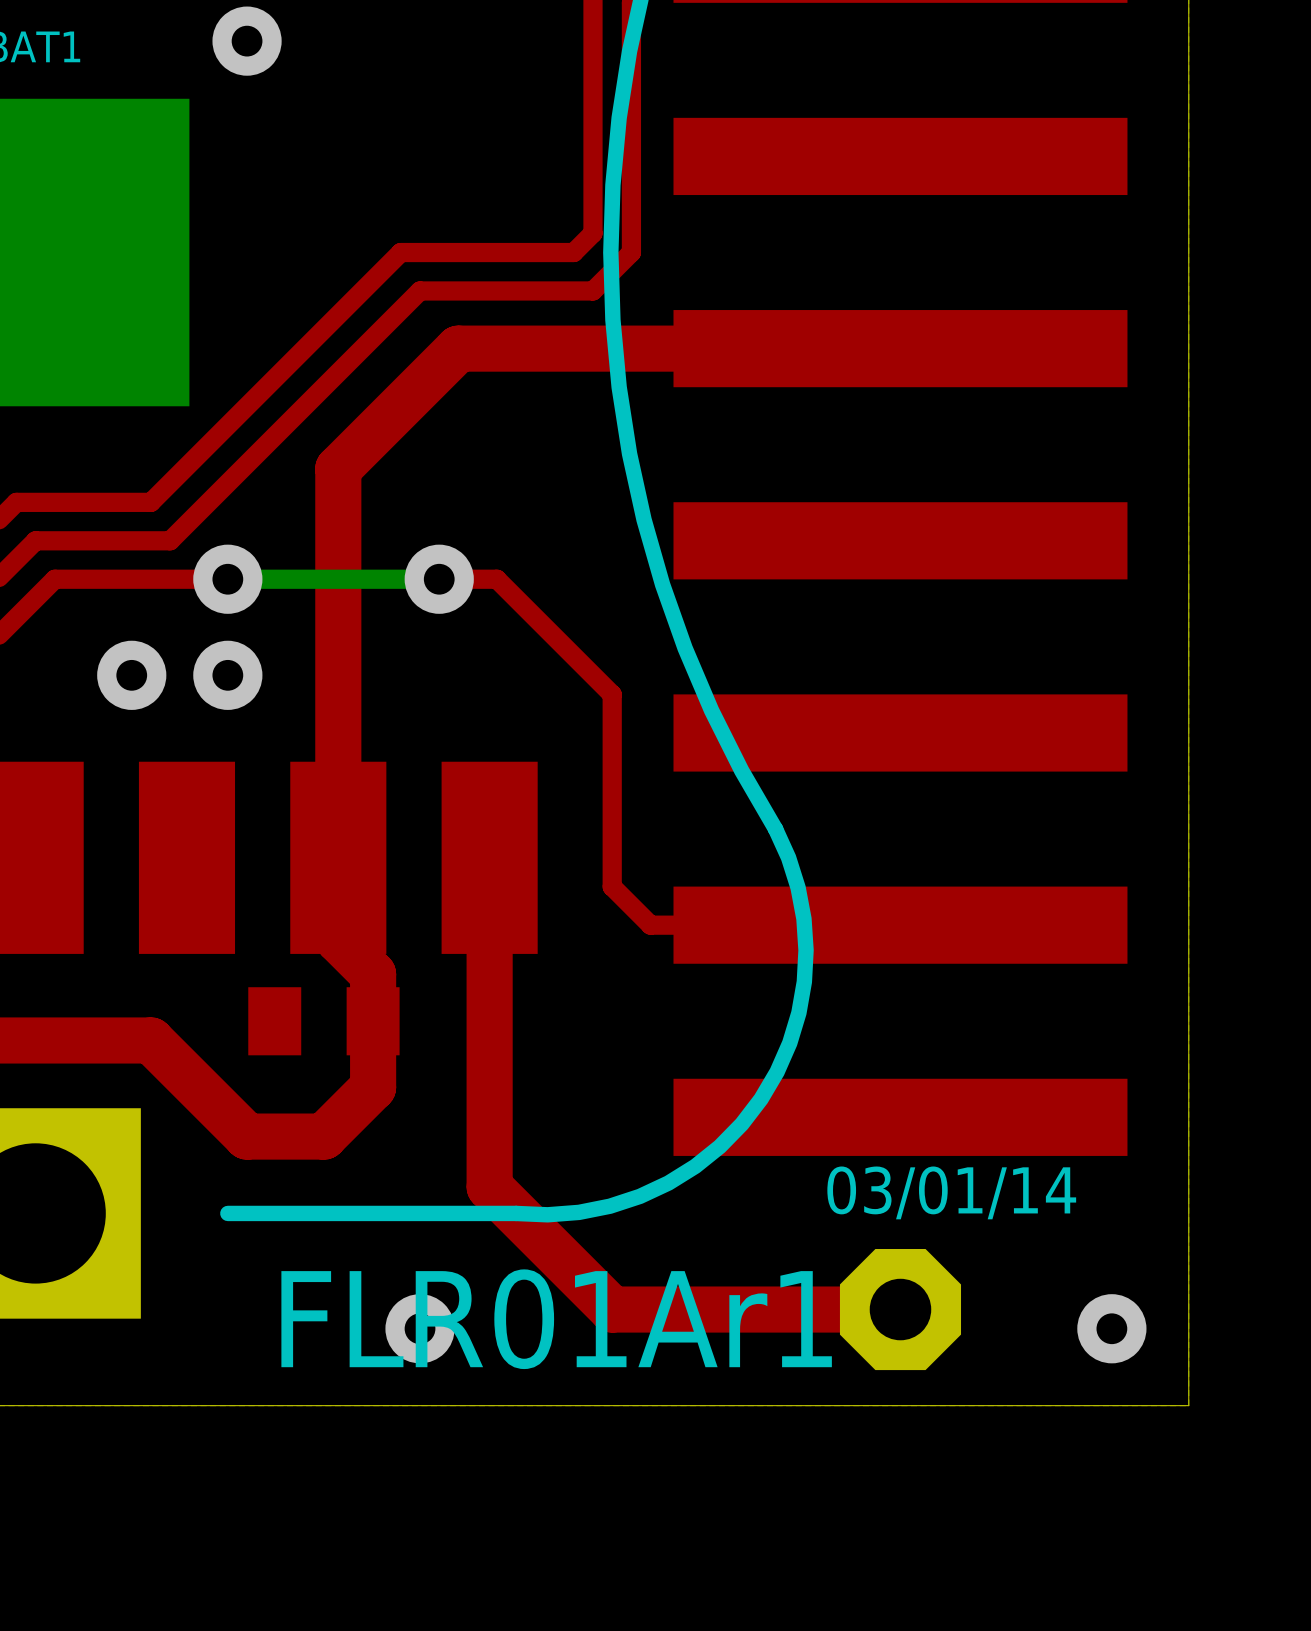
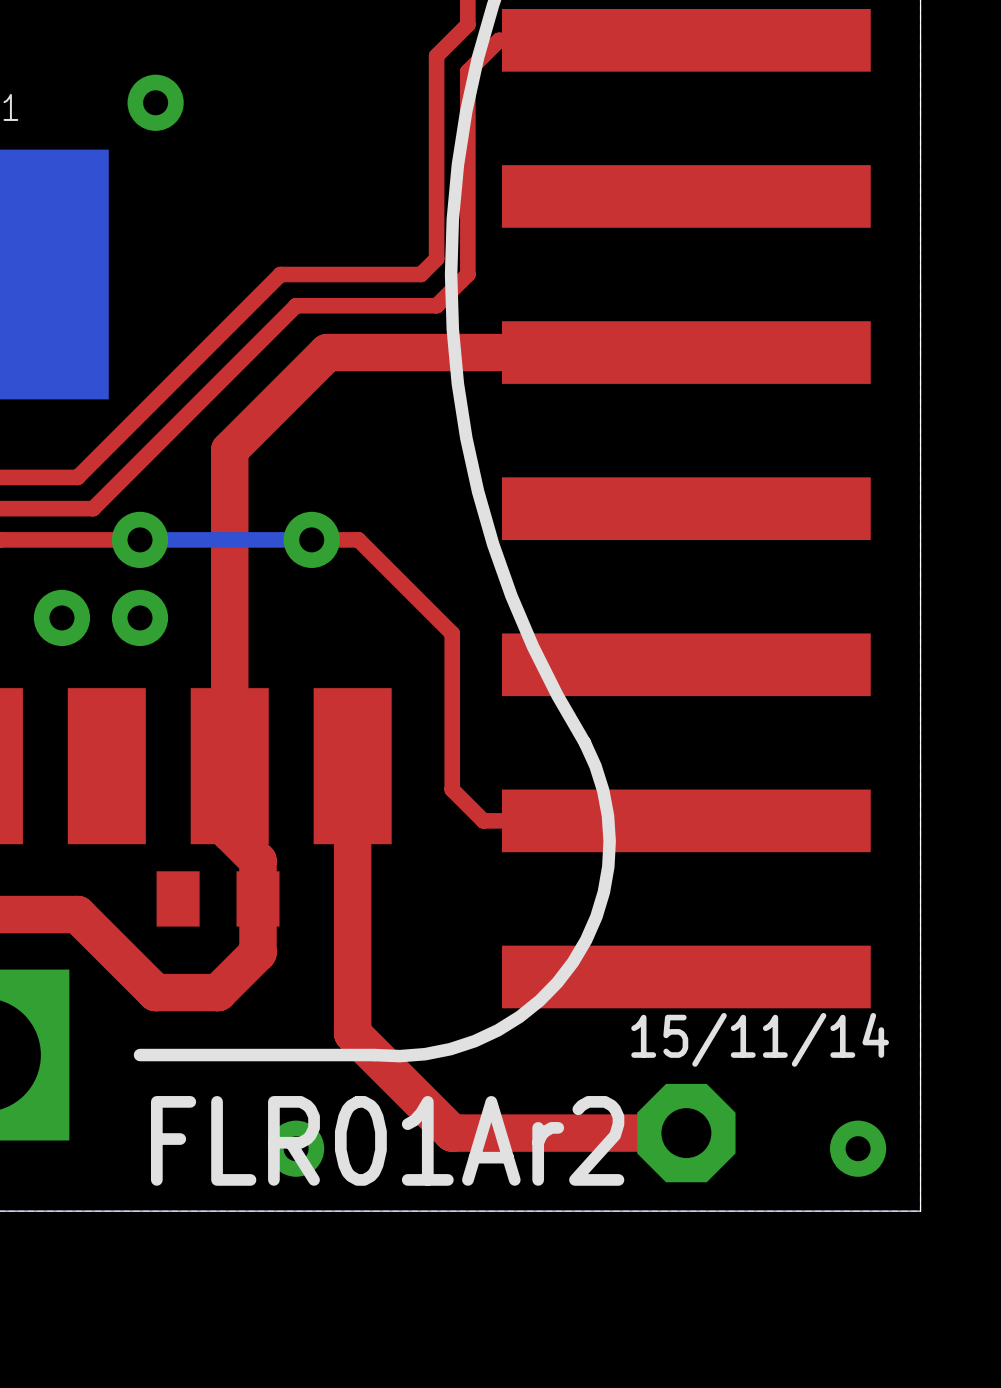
text: 03/01/14 (951, 1192) -> 15/11/14 (760, 1039)
text: FLR01Ar1 (556, 1319) -> FLR01Ar2 (387, 1140)

